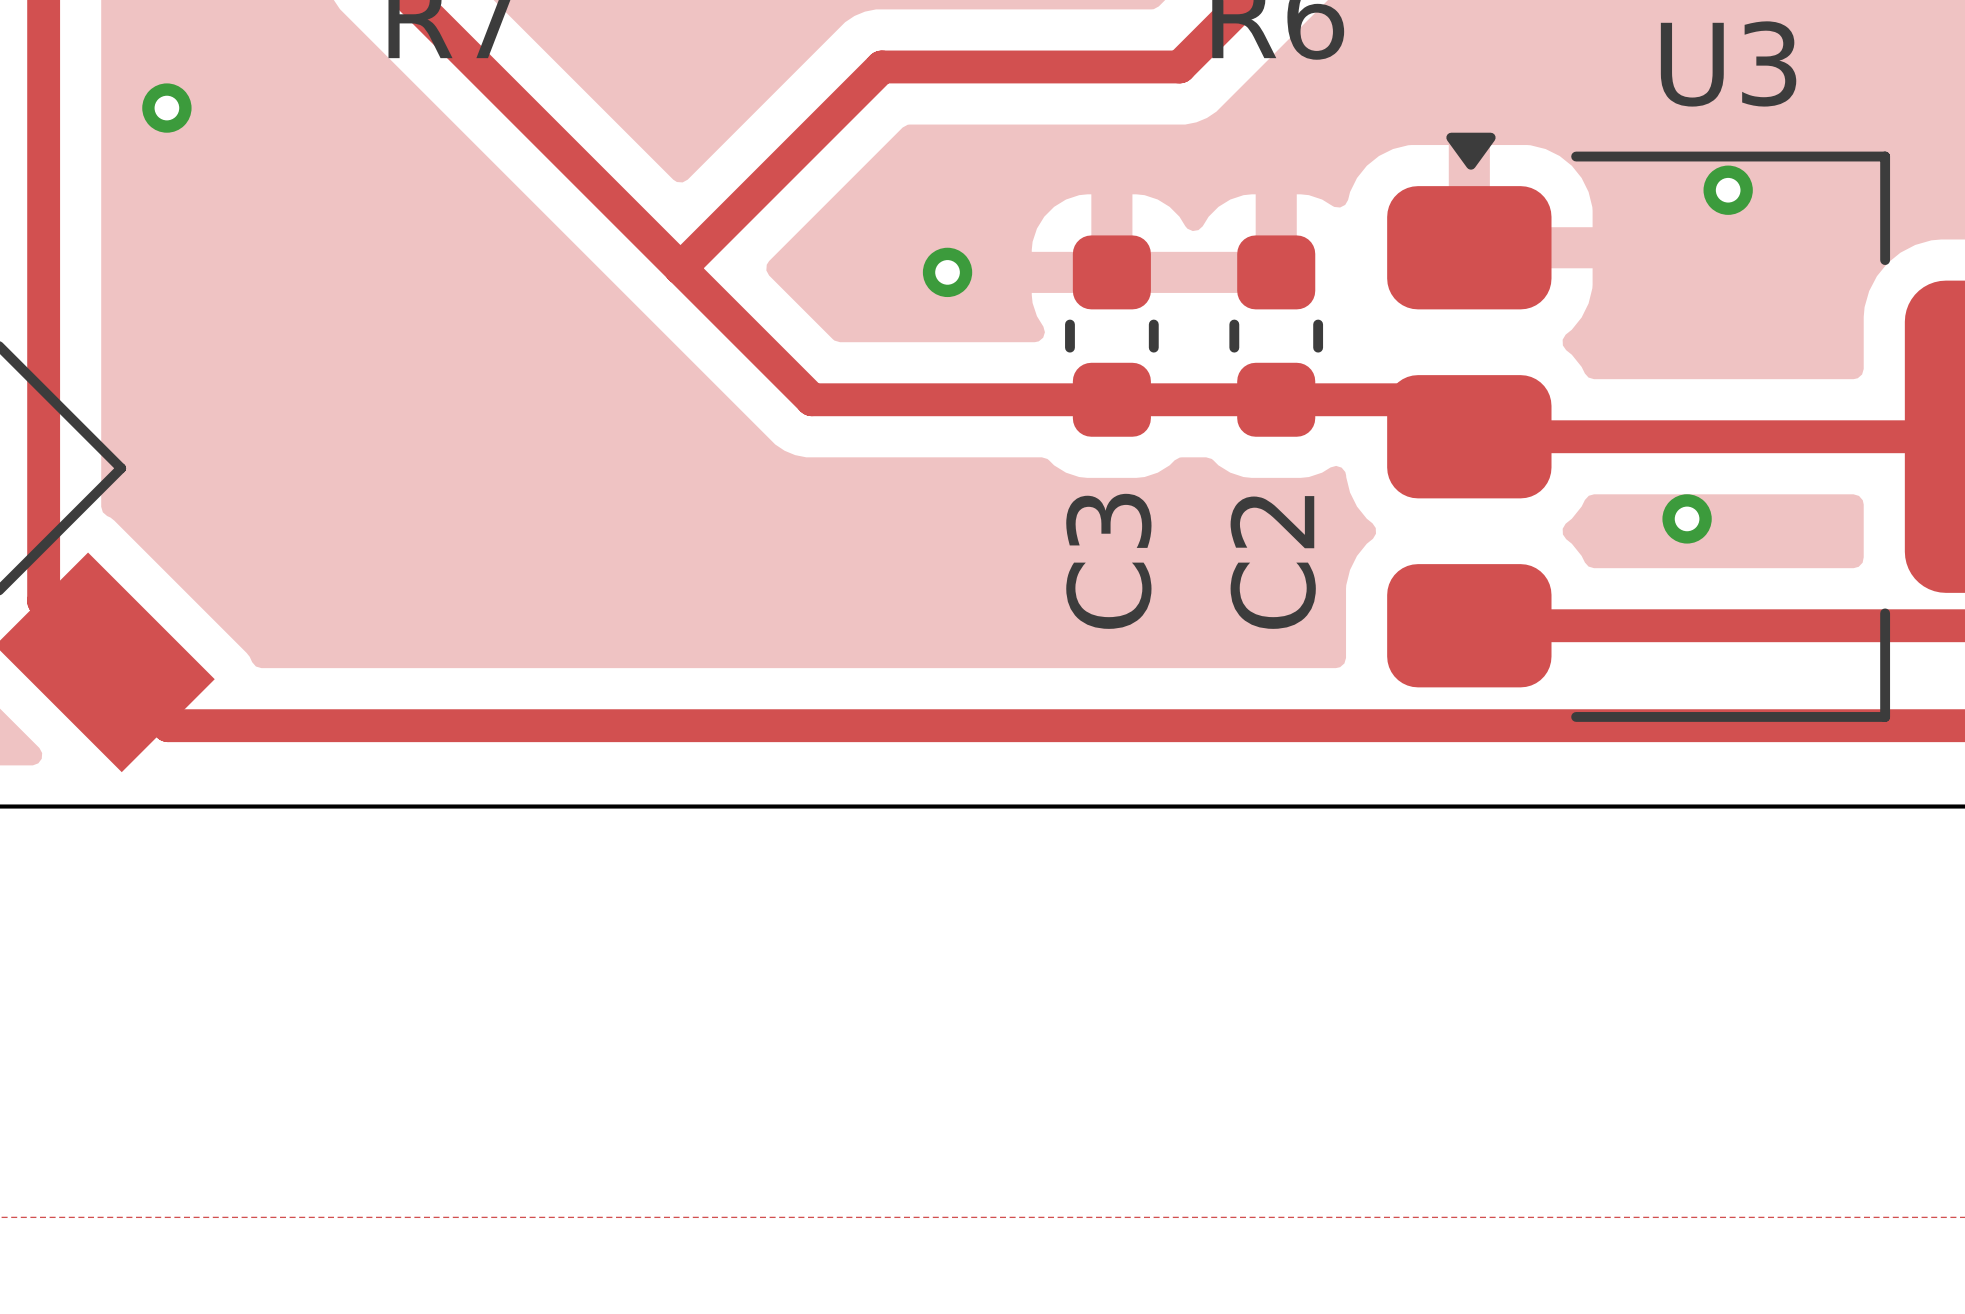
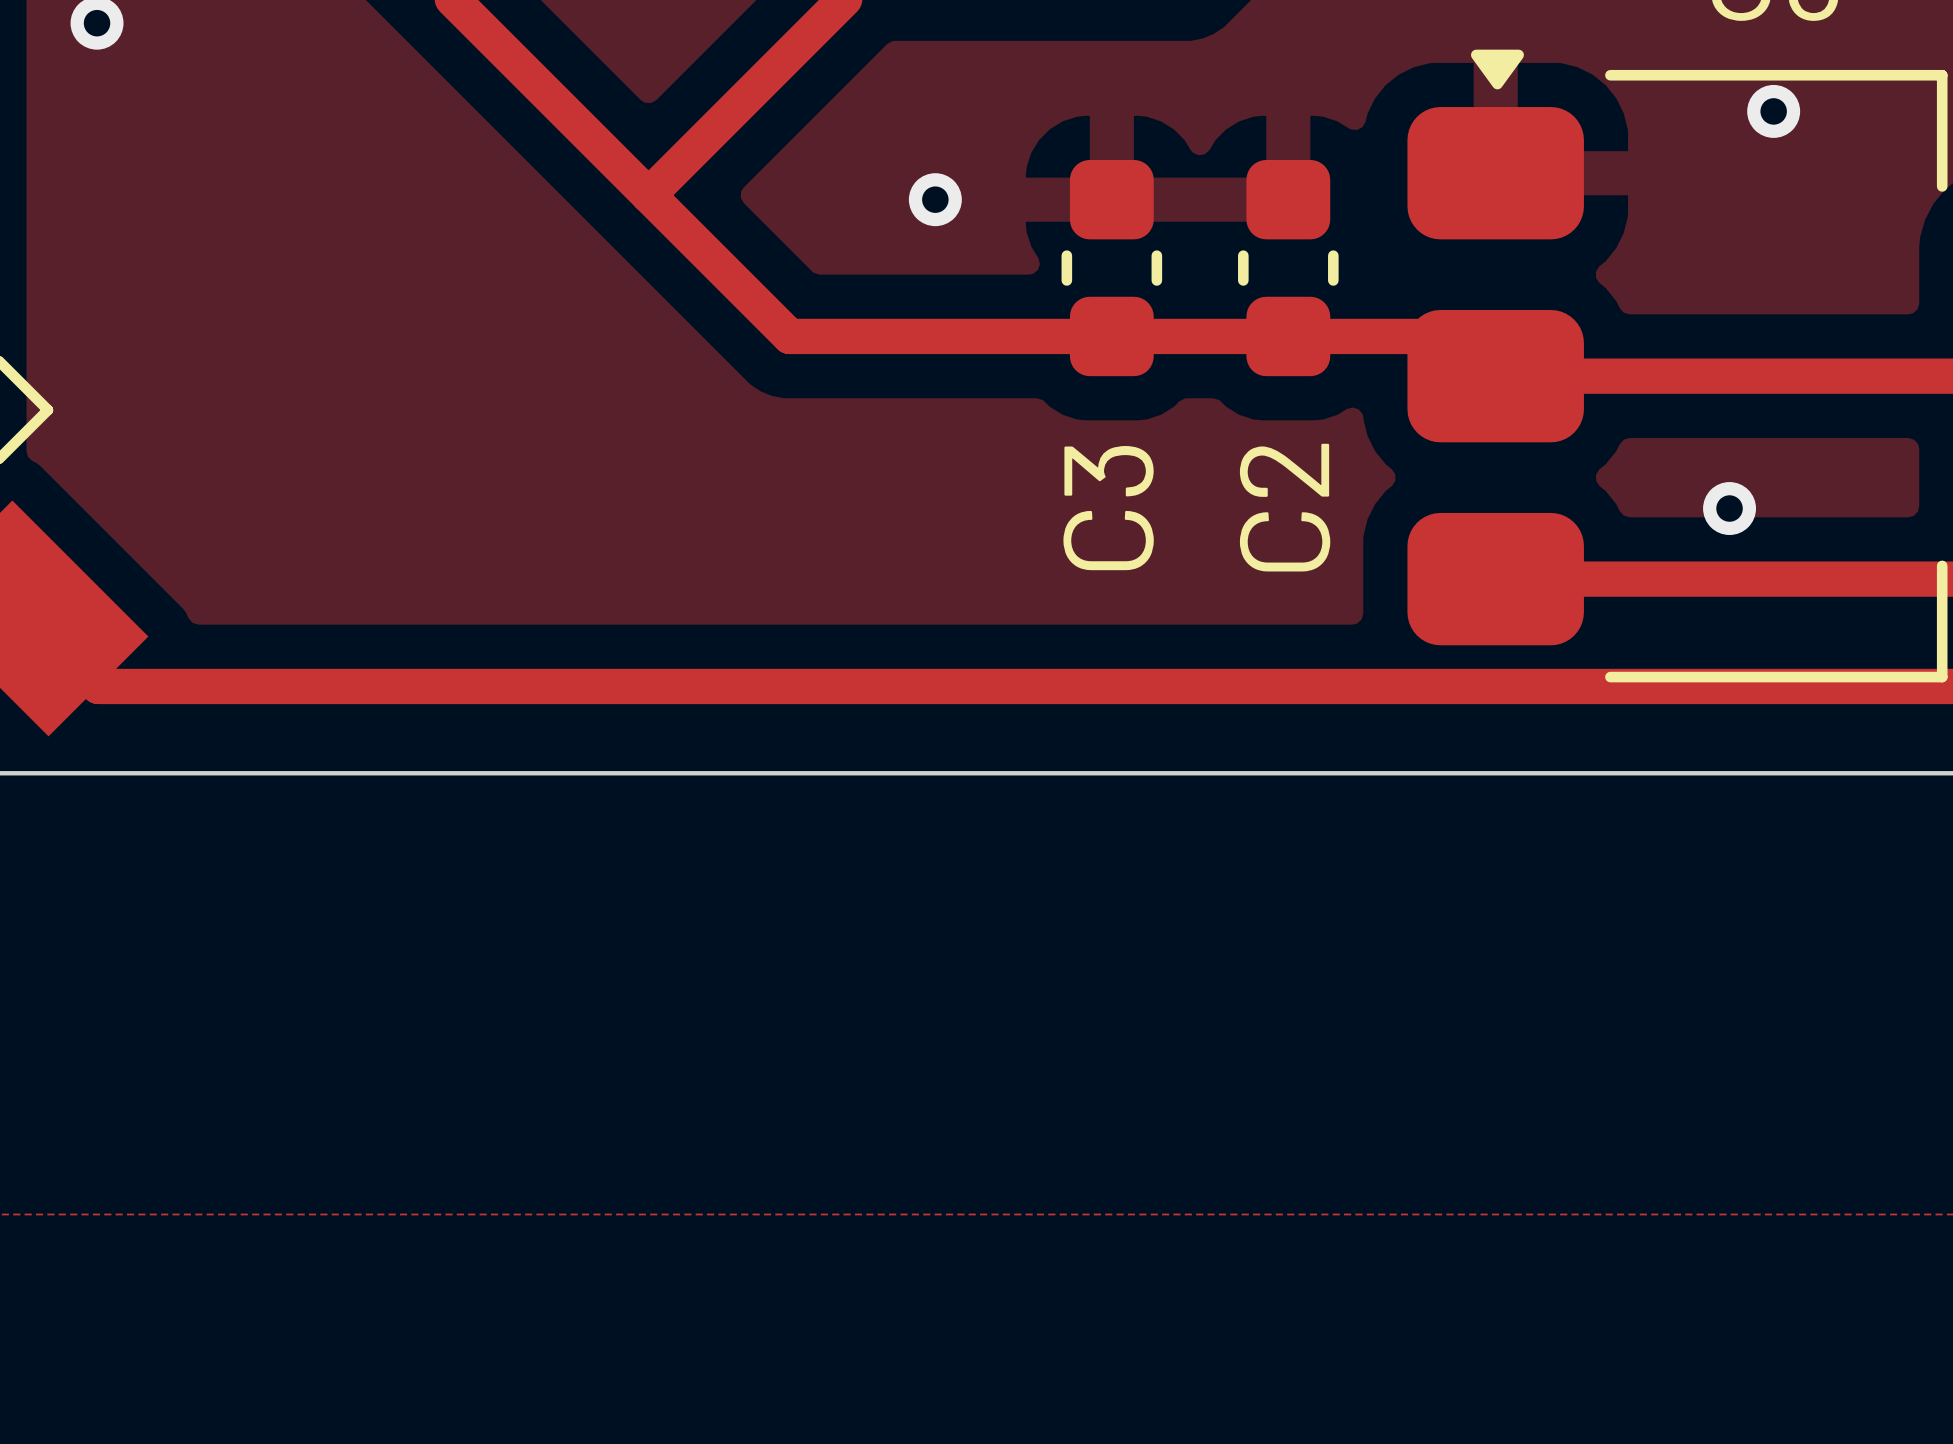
via position: (1687, 518) -> (1729, 508)

